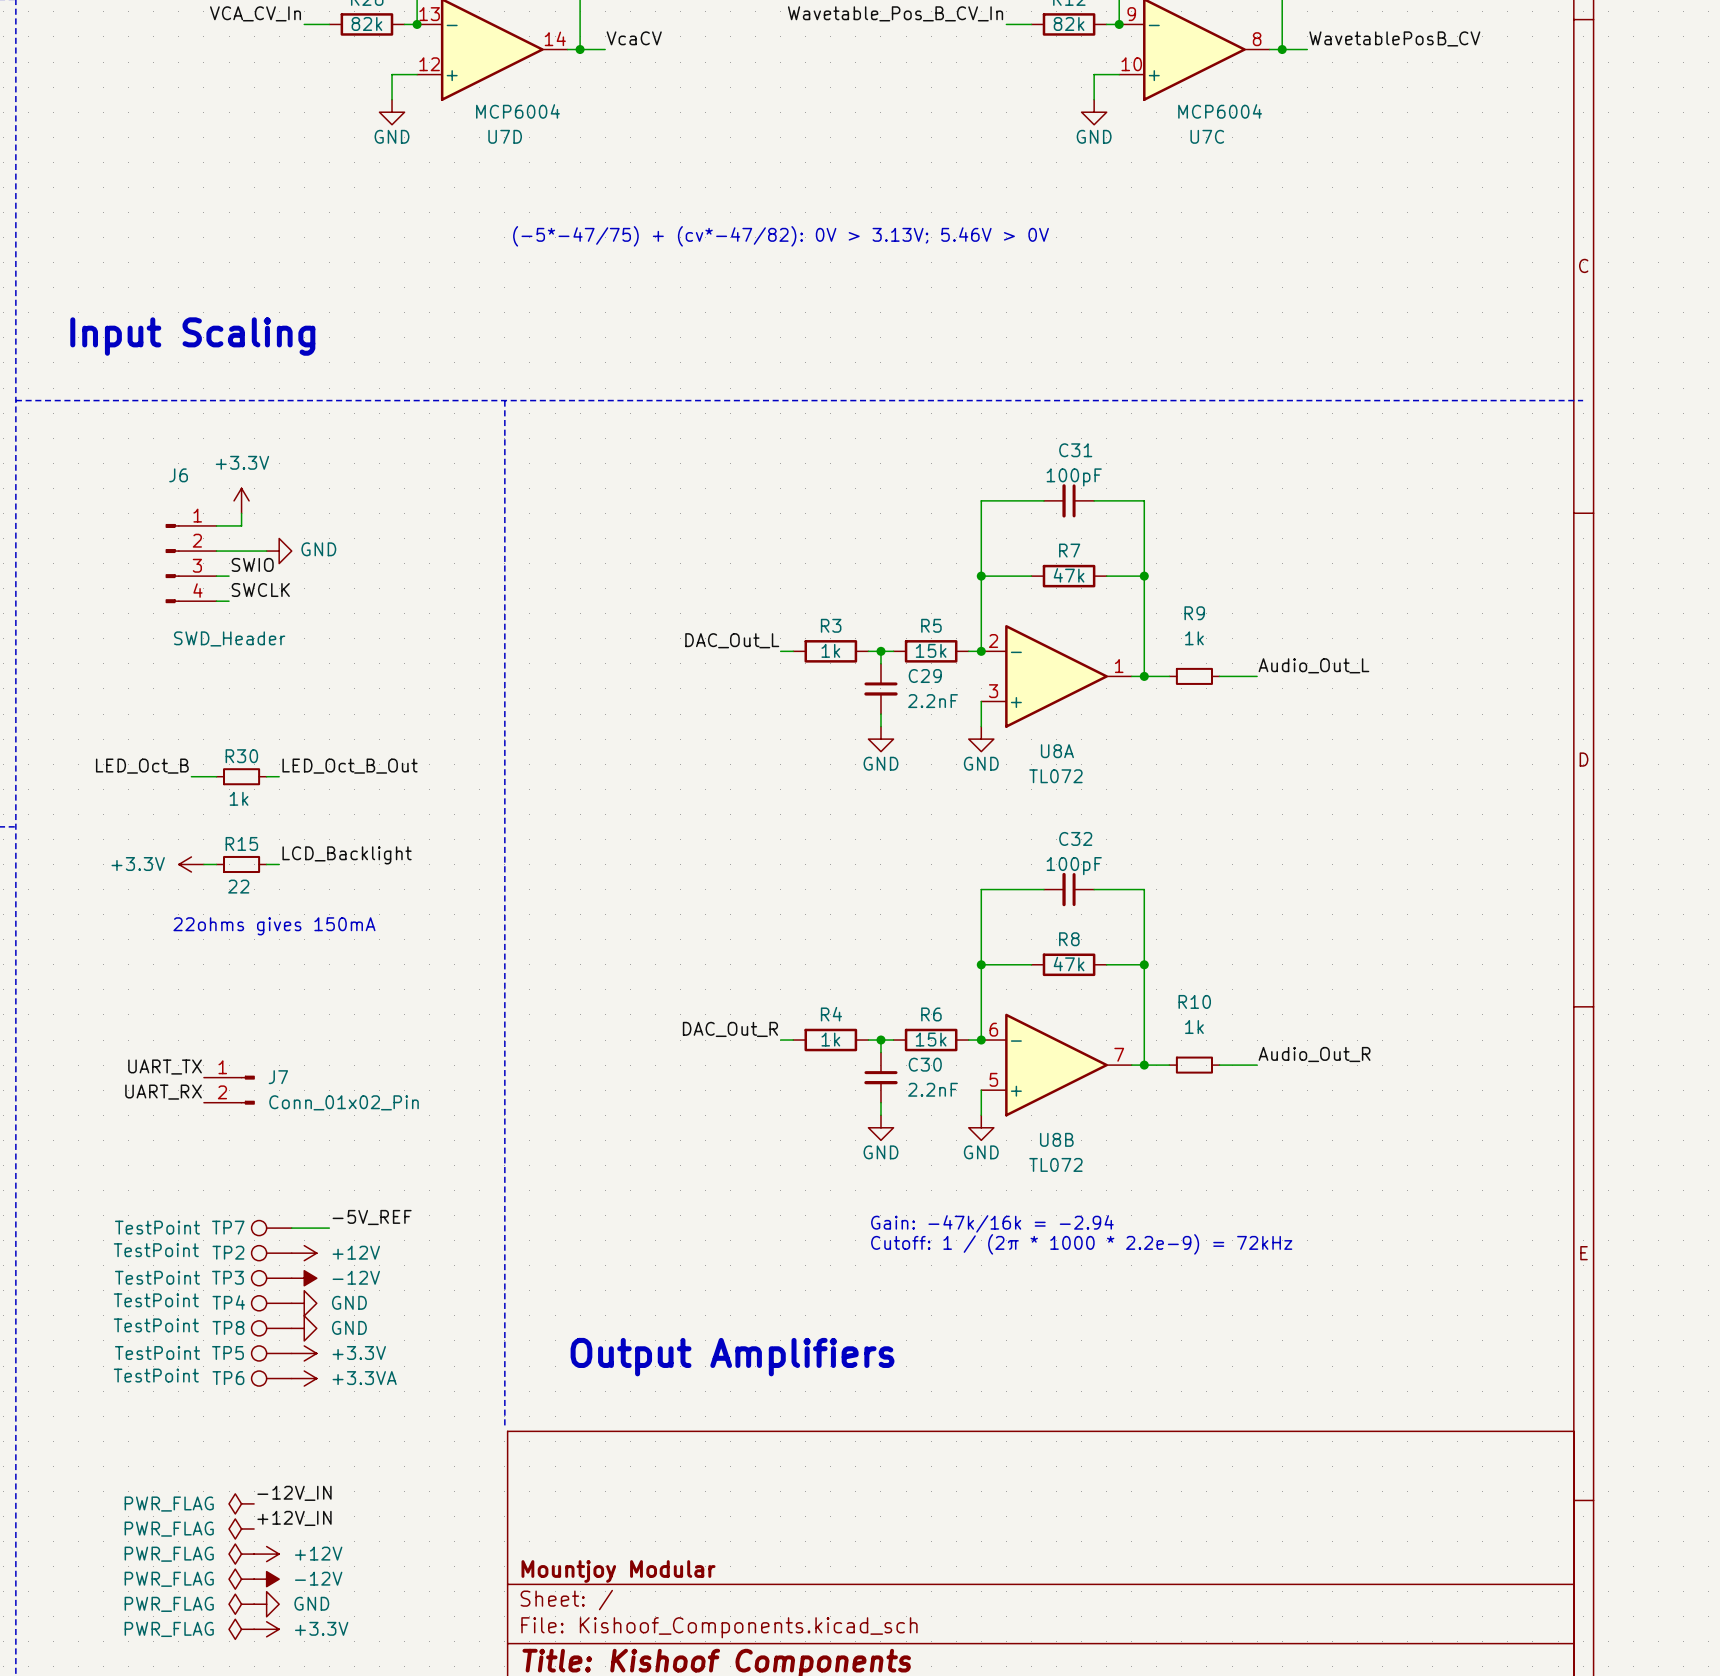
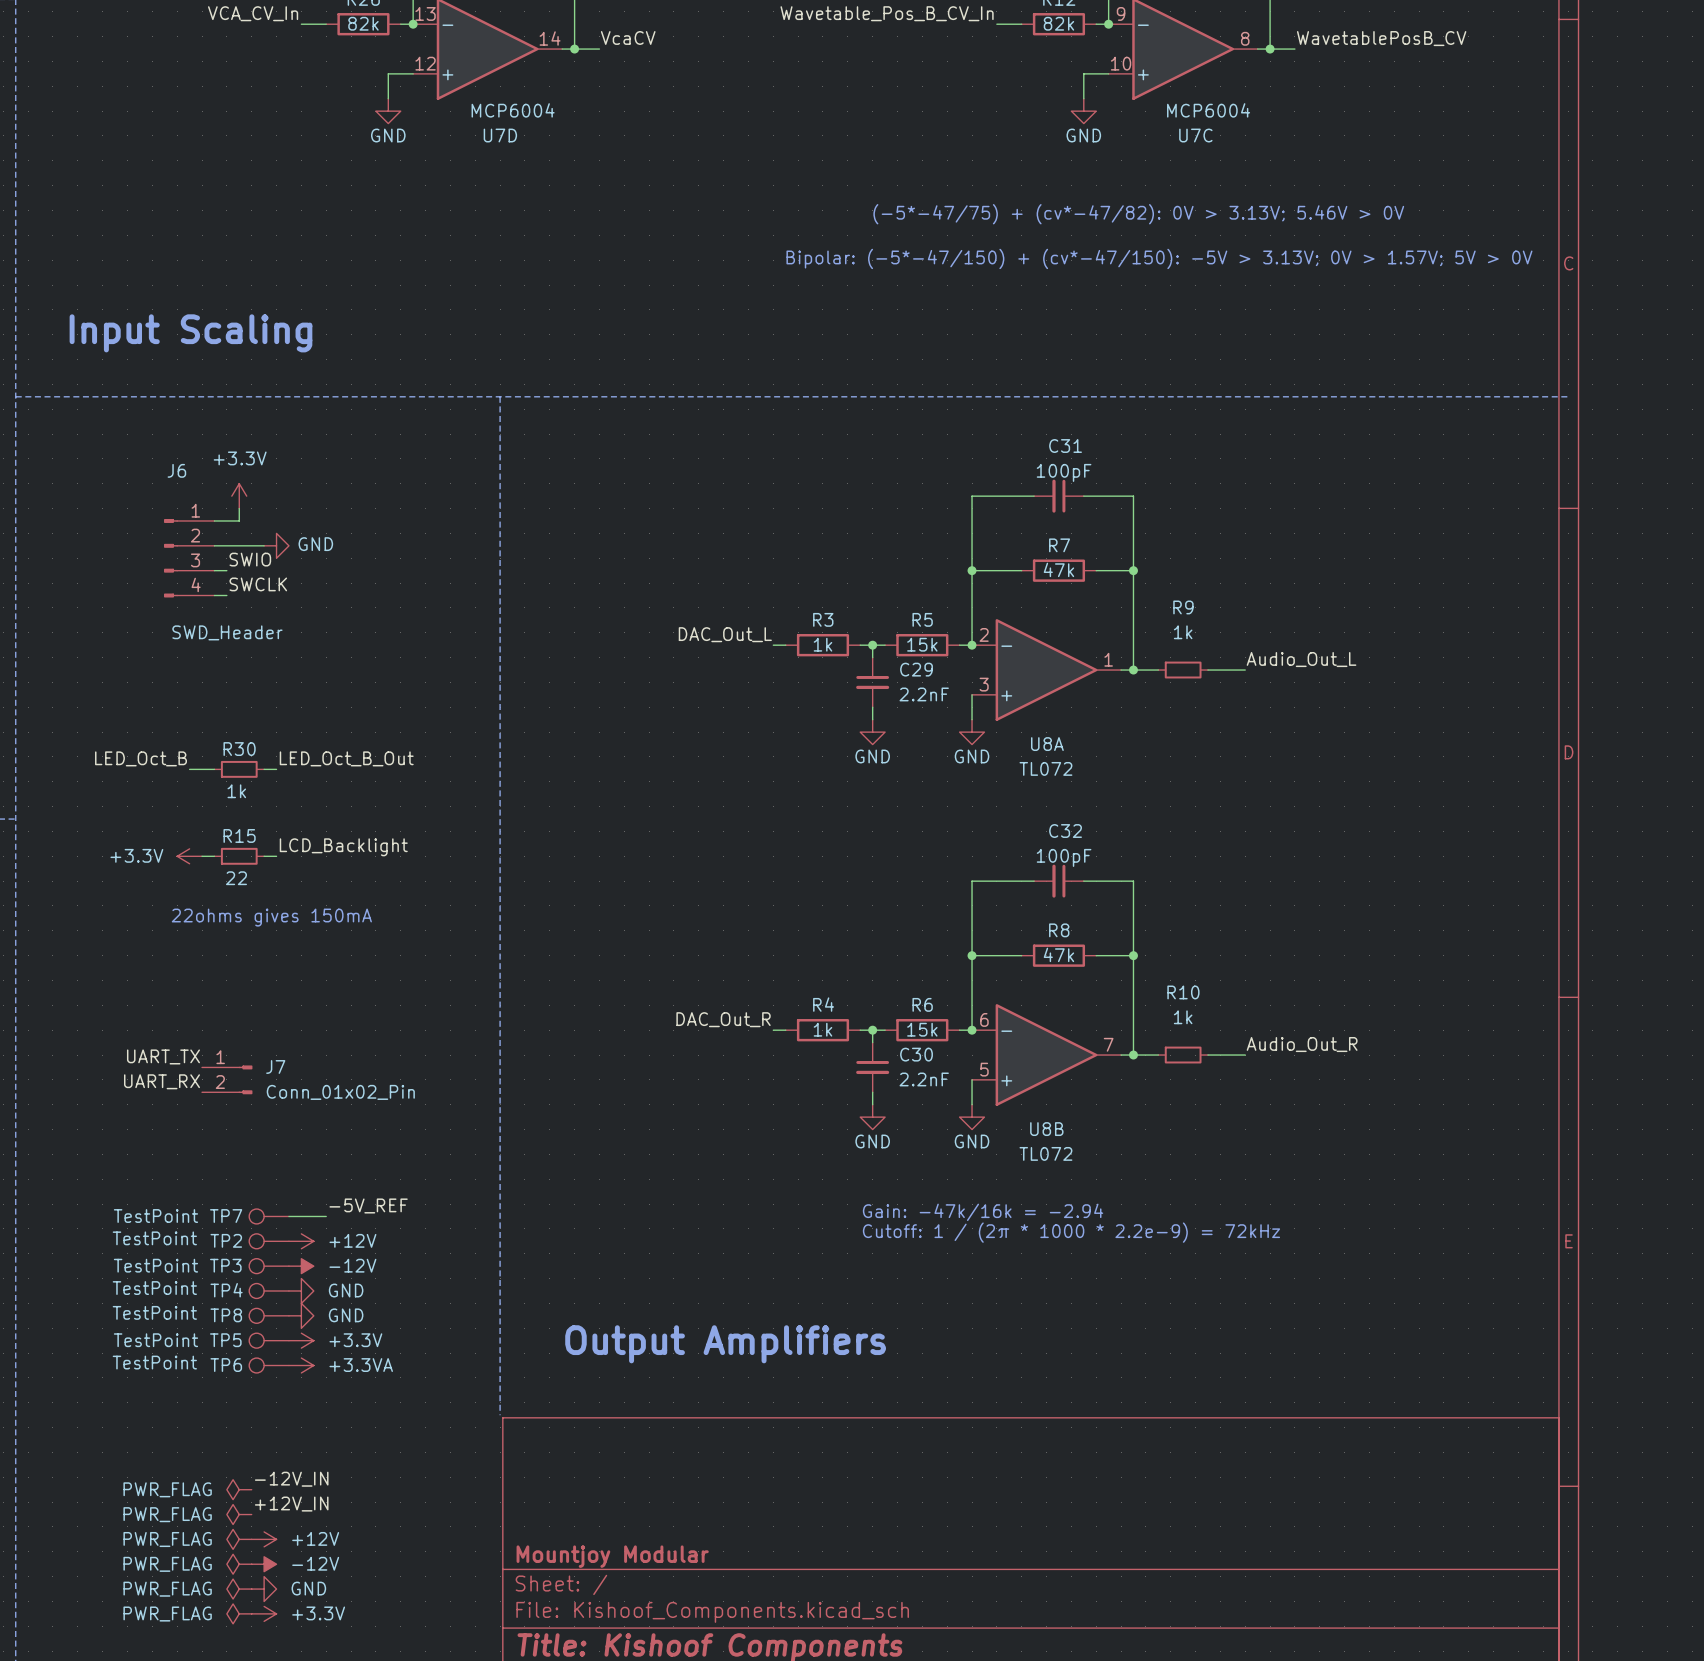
text: none -> (-5*-47/75) + (cv*-47/82): 0V > 3.13V; 5.46V > 0V (1138, 214)
text: (-5*-47/75) + (cv*-47/82): 0V > 3.13V; 5.46V > 0V (781, 236) -> none
text: none -> Bipolar: (-5*-47/150) + (cv*-47/150): -5V > 3.13V; 0V > 1.57V; 5V > 0V (1159, 258)

